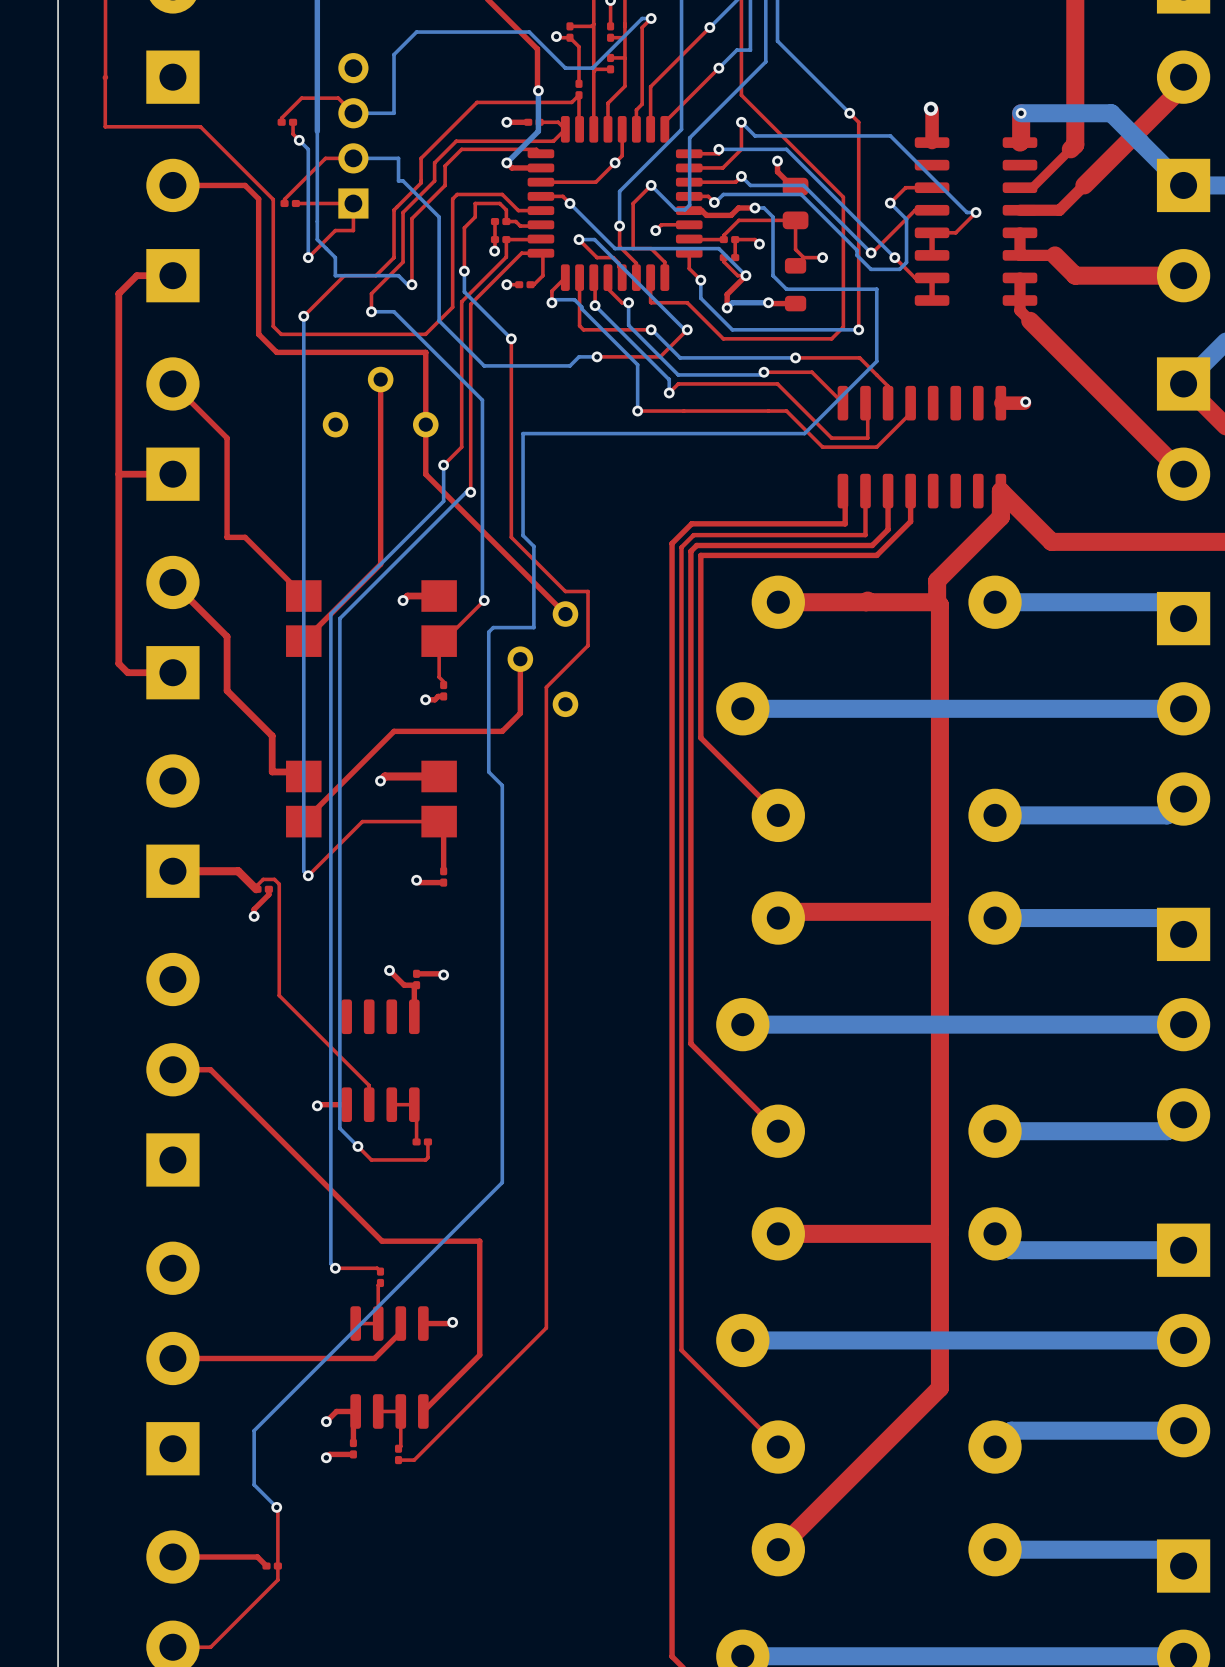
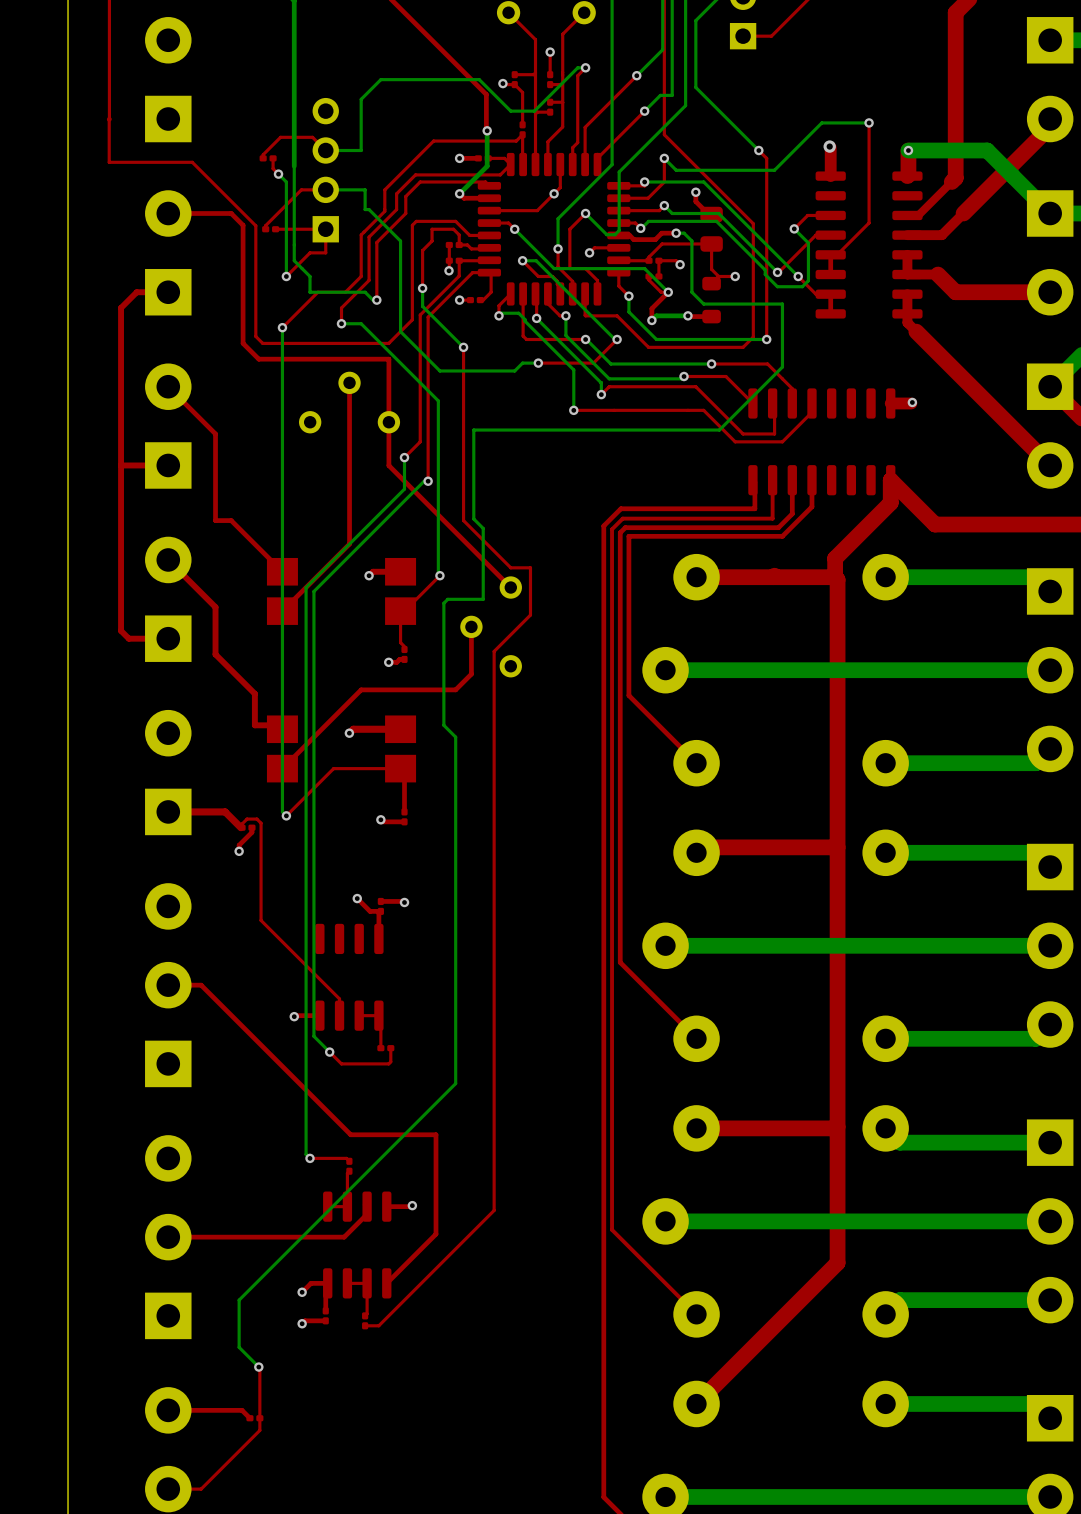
via: none -> (869, 122)
bottom track: (867, 135) (890, 135) (967, 212) (976, 212) -> (774, 170) (821, 122) (869, 122)
top track: (976, 212) (955, 232) (939, 232) -> (869, 122) (869, 222) (837, 254)
via: (976, 212) -> none

